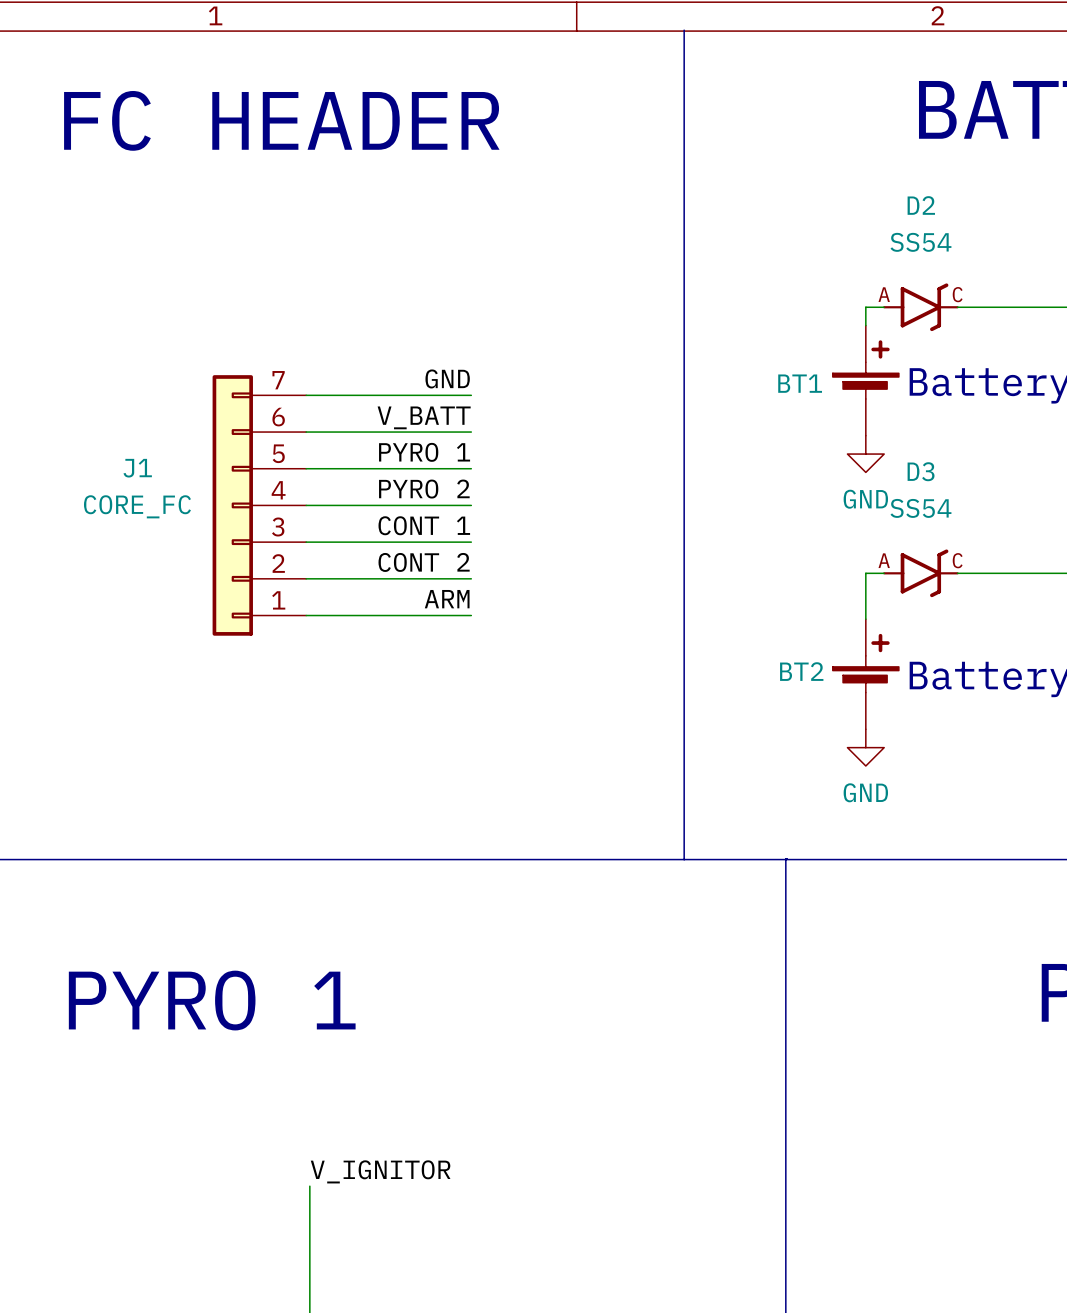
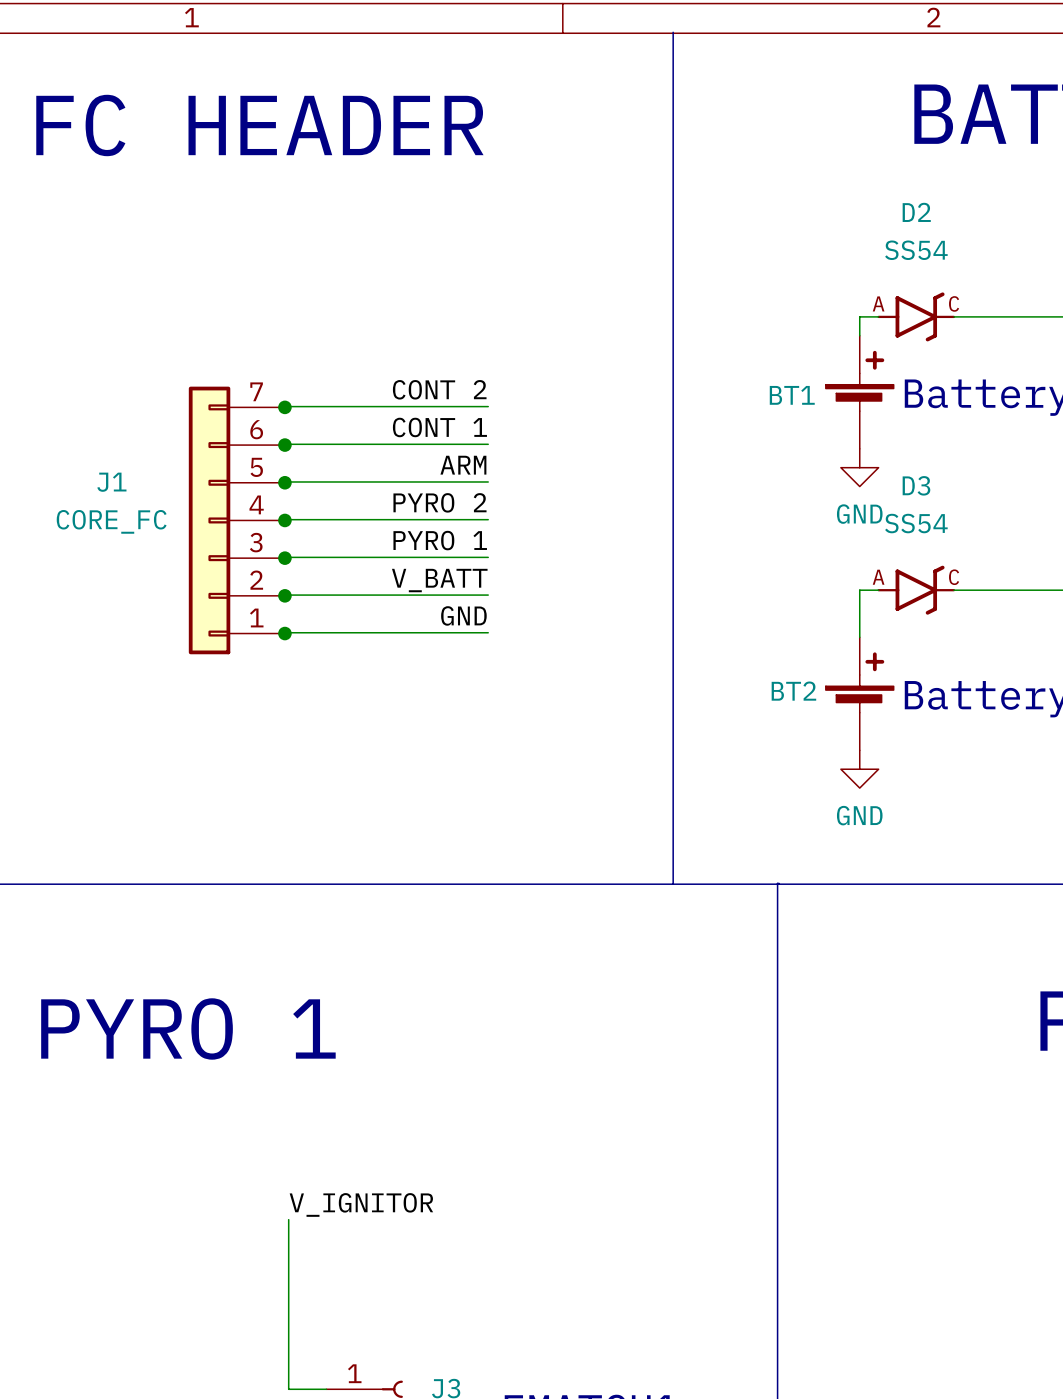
label position: GND (447, 378) -> GND (463, 615)
wire: (306, 395) (471, 395) -> (284, 407) (488, 406)
junction: none -> (284, 407)
label position: V_BATT (424, 417) -> V_BATT (439, 580)
wire: (306, 432) (471, 432) -> (284, 445) (488, 444)
junction: none -> (284, 445)
label position: PYRO 1 (424, 452) -> PYRO 1 (440, 540)
wire: (306, 468) (471, 468) -> (284, 482) (488, 481)
junction: none -> (284, 482)
label position: PYRO 2 (424, 489) -> PYRO 2 (439, 502)
wire: (306, 505) (471, 505) -> (284, 520) (488, 519)
junction: none -> (284, 520)
label position: CONT 1 (424, 525) -> CONT 1 (439, 427)
wire: (306, 542) (471, 542) -> (284, 558) (488, 557)
junction: none -> (284, 558)
label position: CONT 2 (424, 562) -> CONT 2 (439, 389)
wire: (306, 578) (471, 578) -> (284, 595) (488, 595)
junction: none -> (284, 595)
label position: ARM (447, 599) -> ARM (463, 465)
wire: (306, 615) (471, 615) -> (284, 633) (488, 632)
junction: none -> (284, 633)

